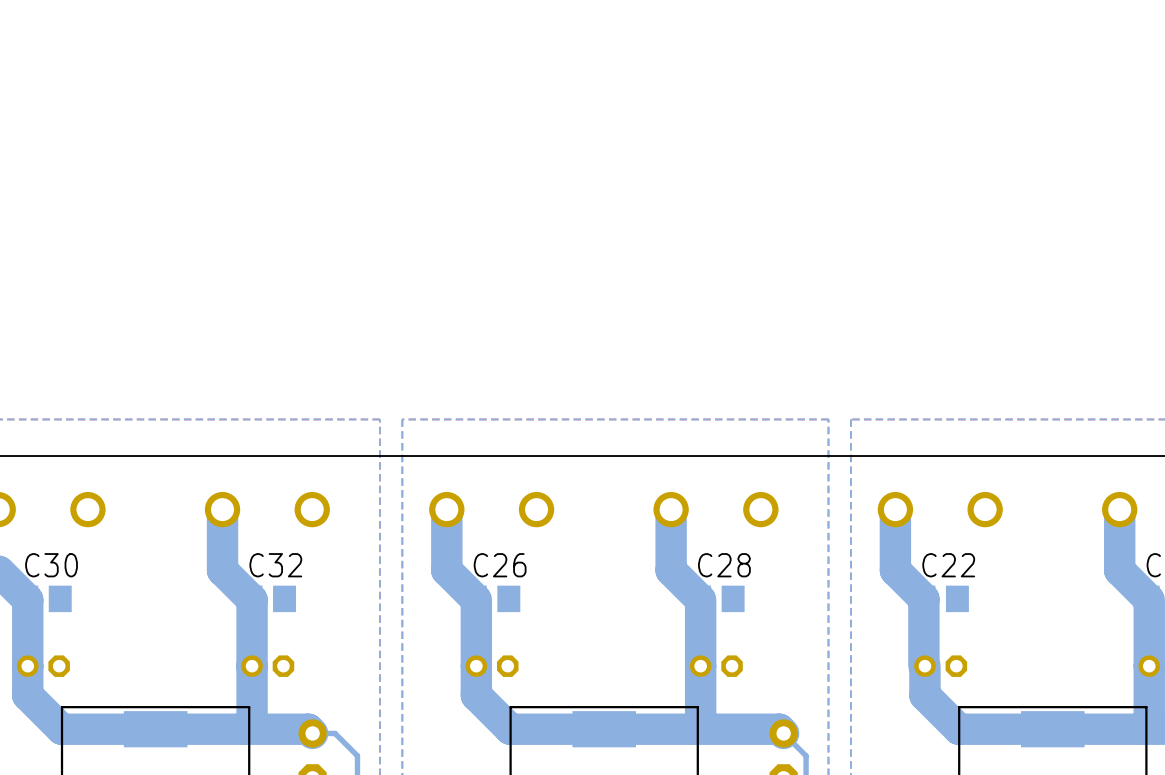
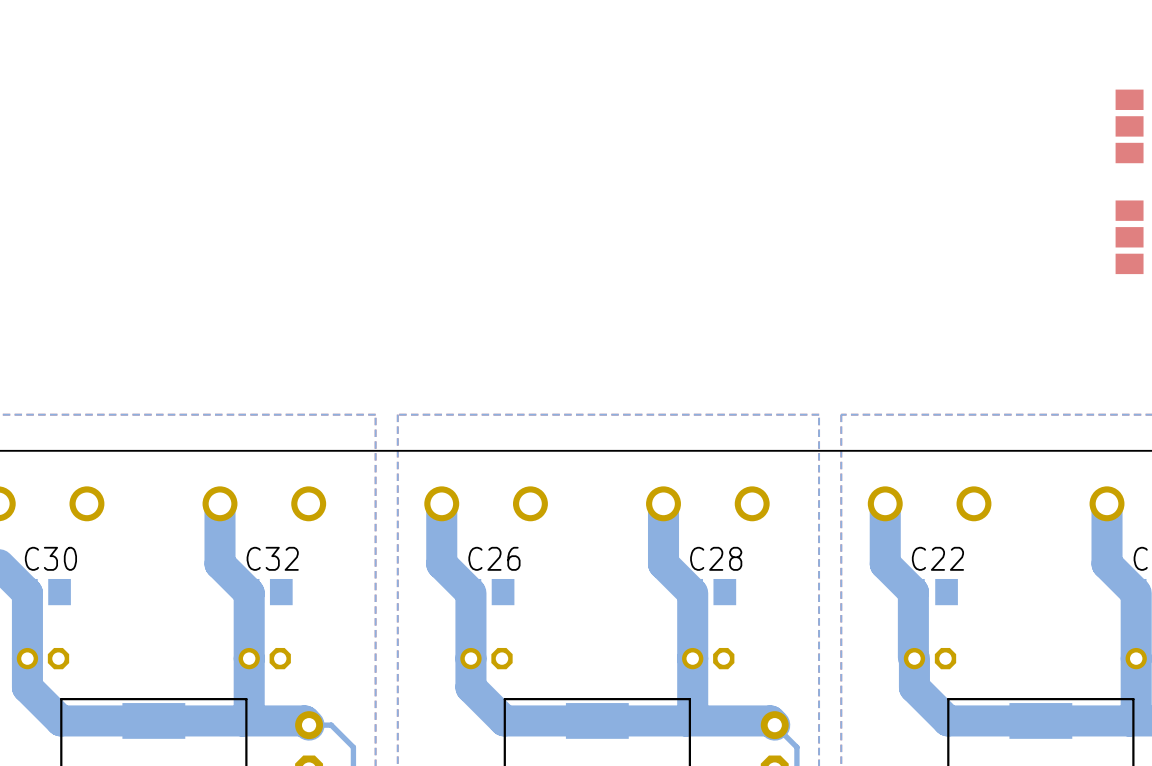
part: none -> (1129, 126)
part: none -> (1129, 237)

